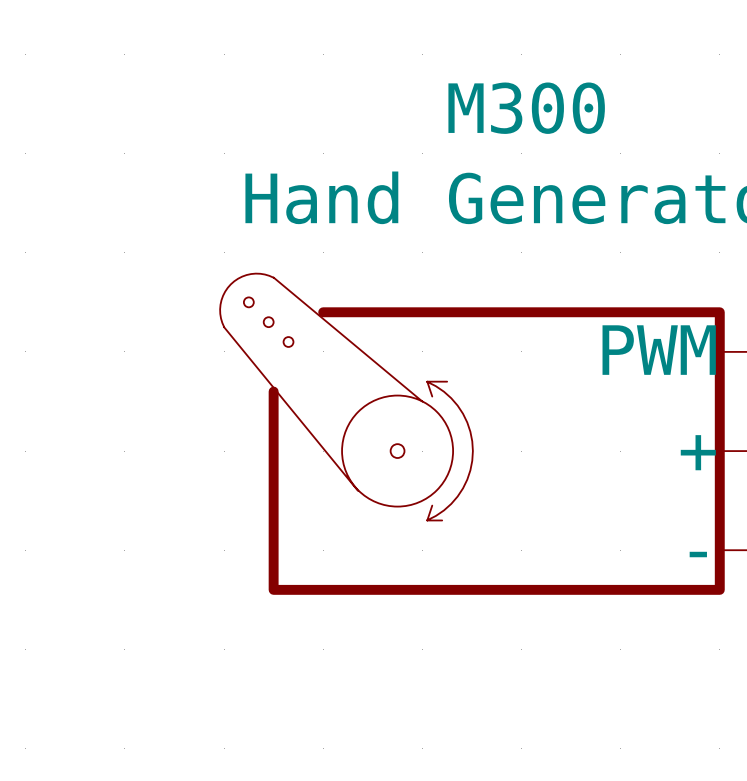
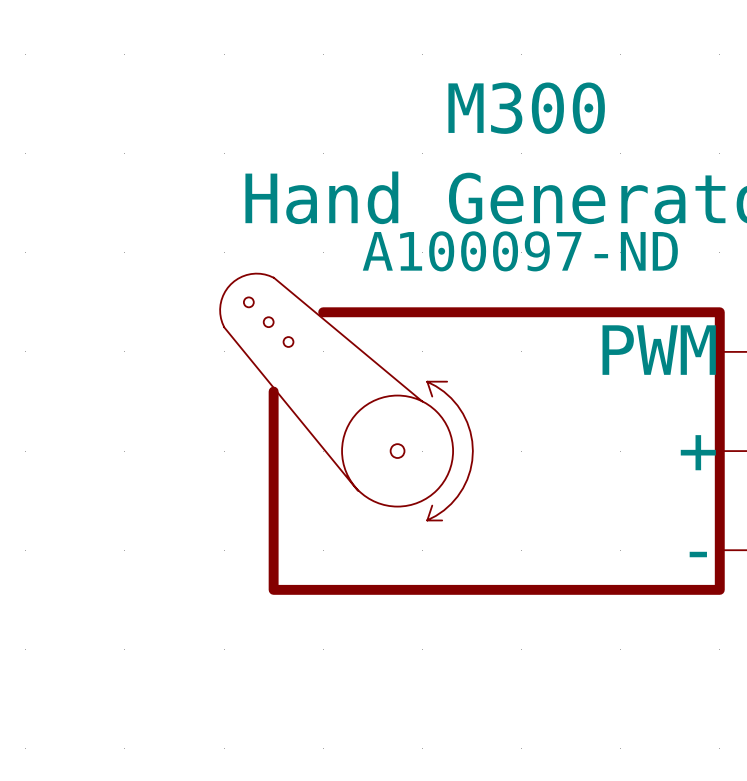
M300 text: none -> A100097-ND (520, 251)

